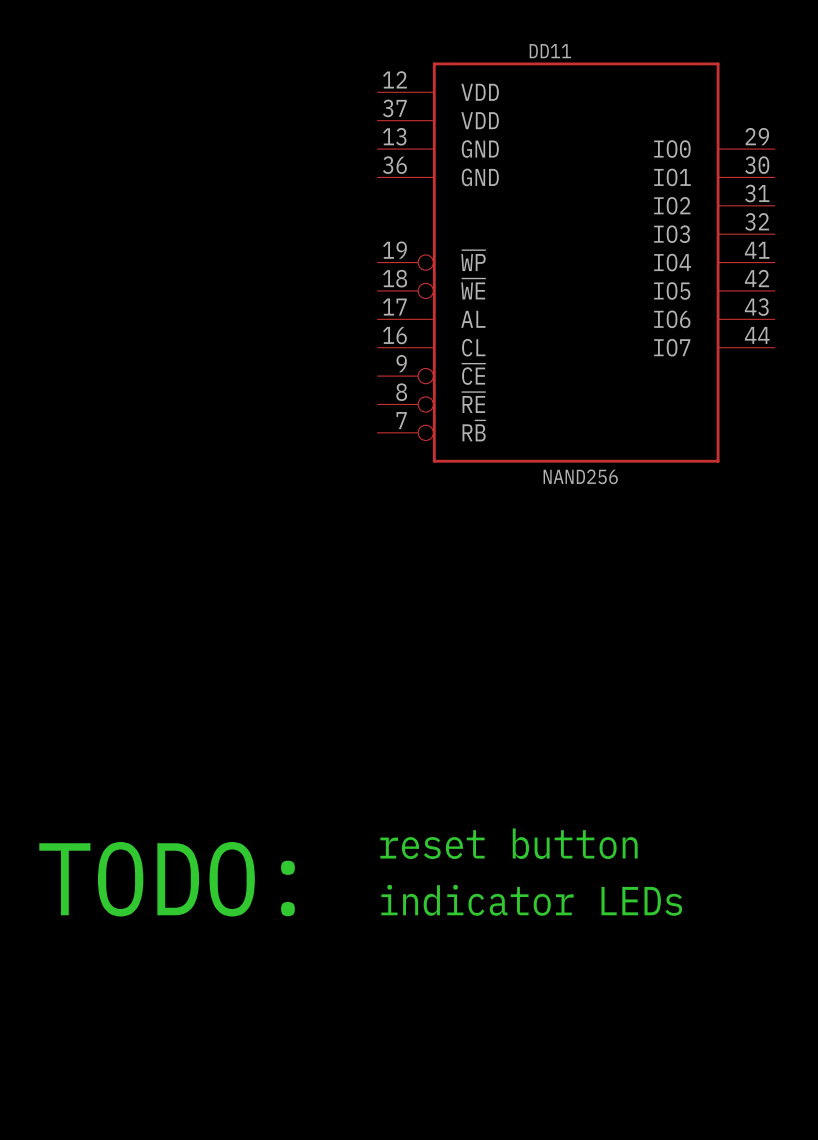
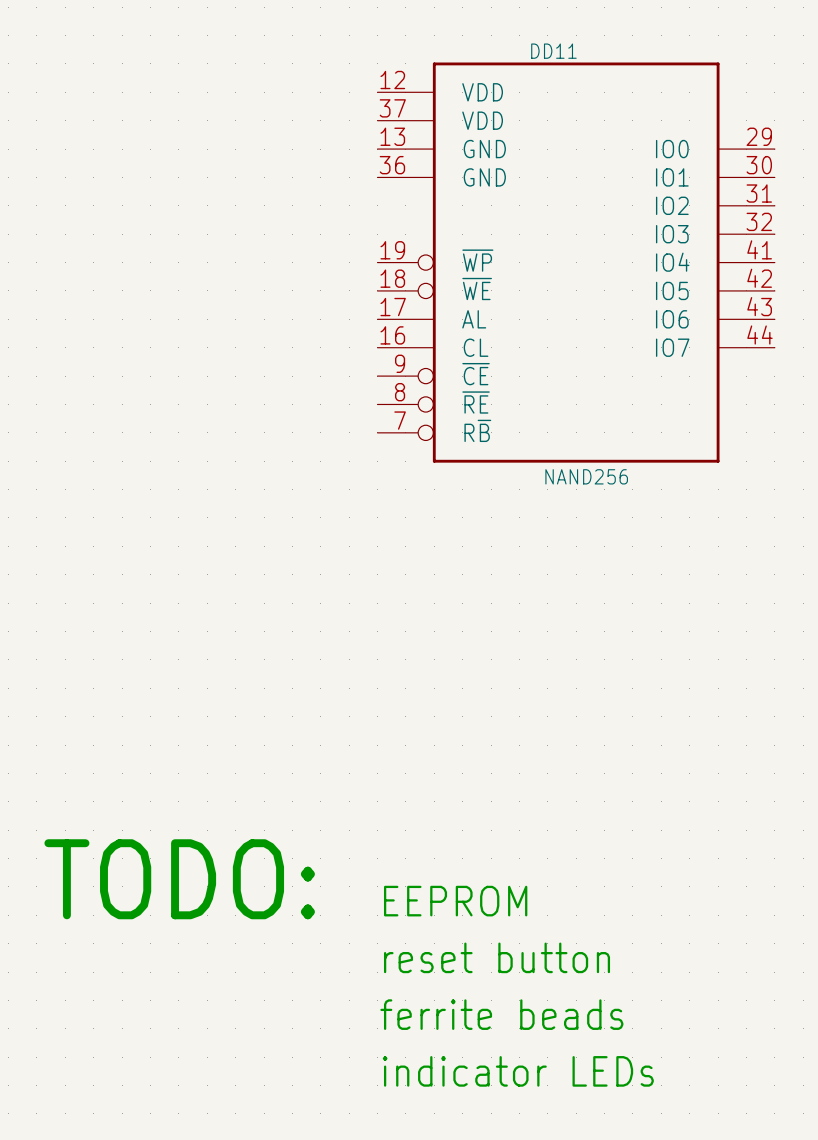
text position: reset button (509, 843) -> reset button (497, 957)
text: indicator LEDs (531, 900) -> EEPROM (455, 901)
text: none -> ferrite beads (501, 1014)
text: none -> indicator LEDs (518, 1071)

